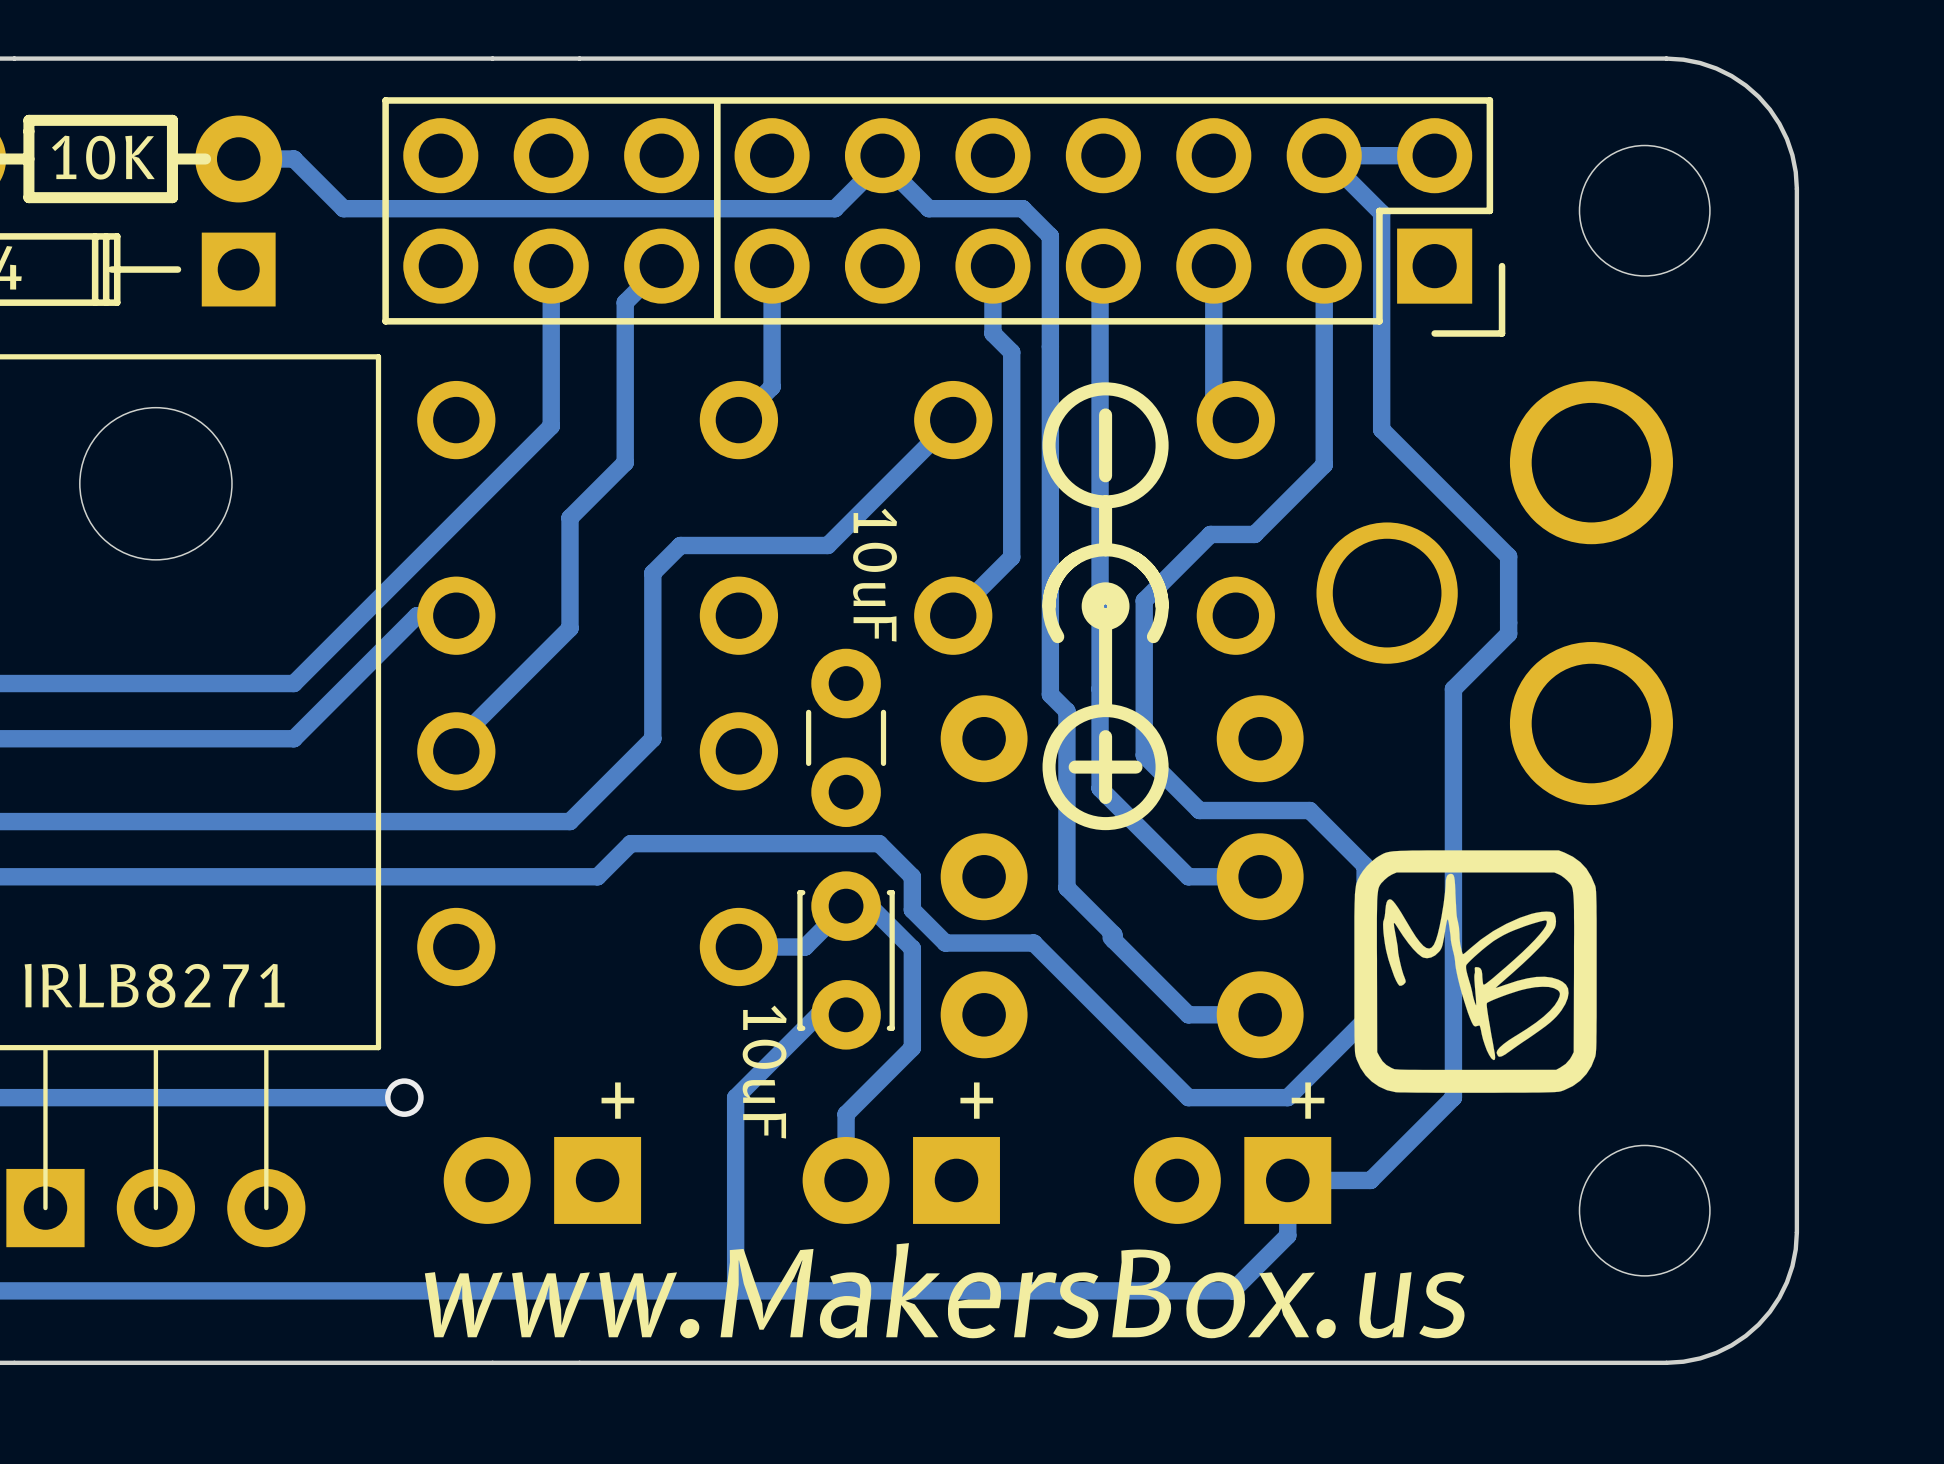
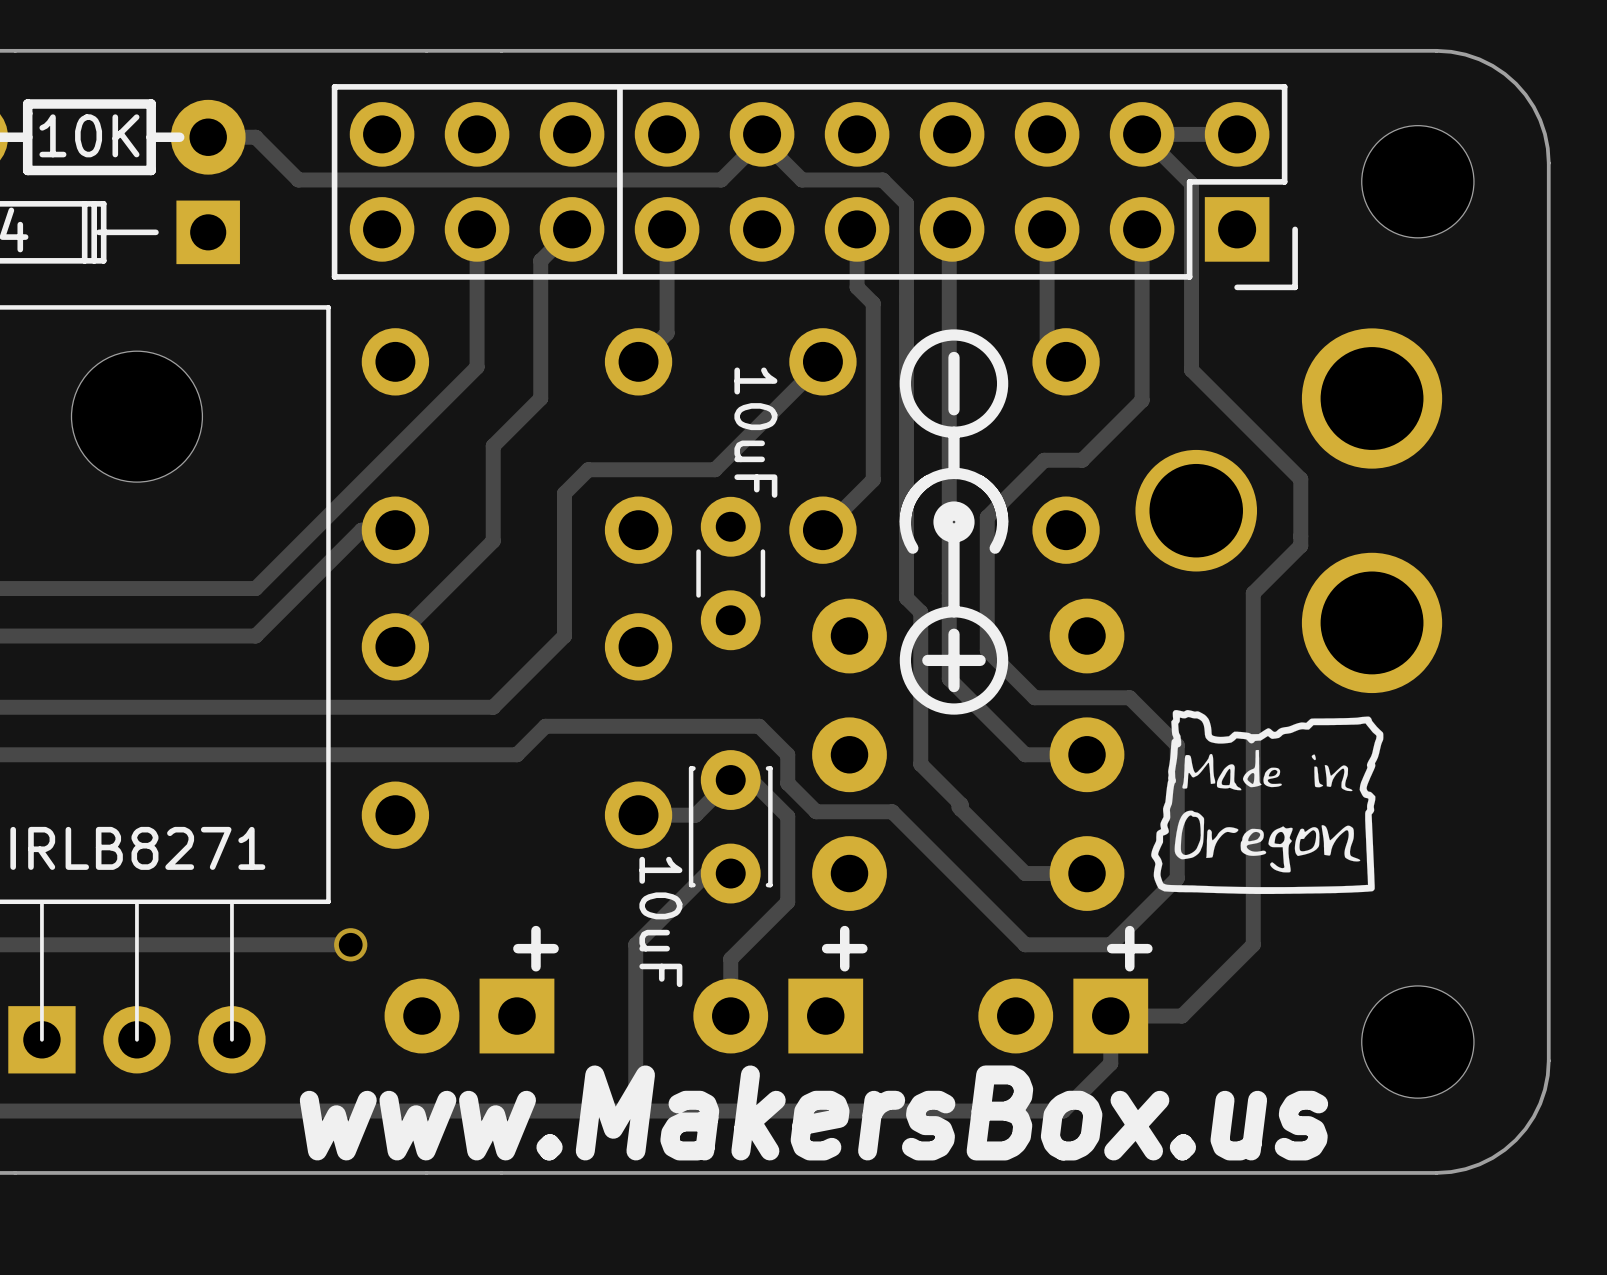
part position: (846, 737) -> (730, 573)
drawing shape: [1354, 850, 1597, 1093] -> [1151, 710, 1384, 895]

